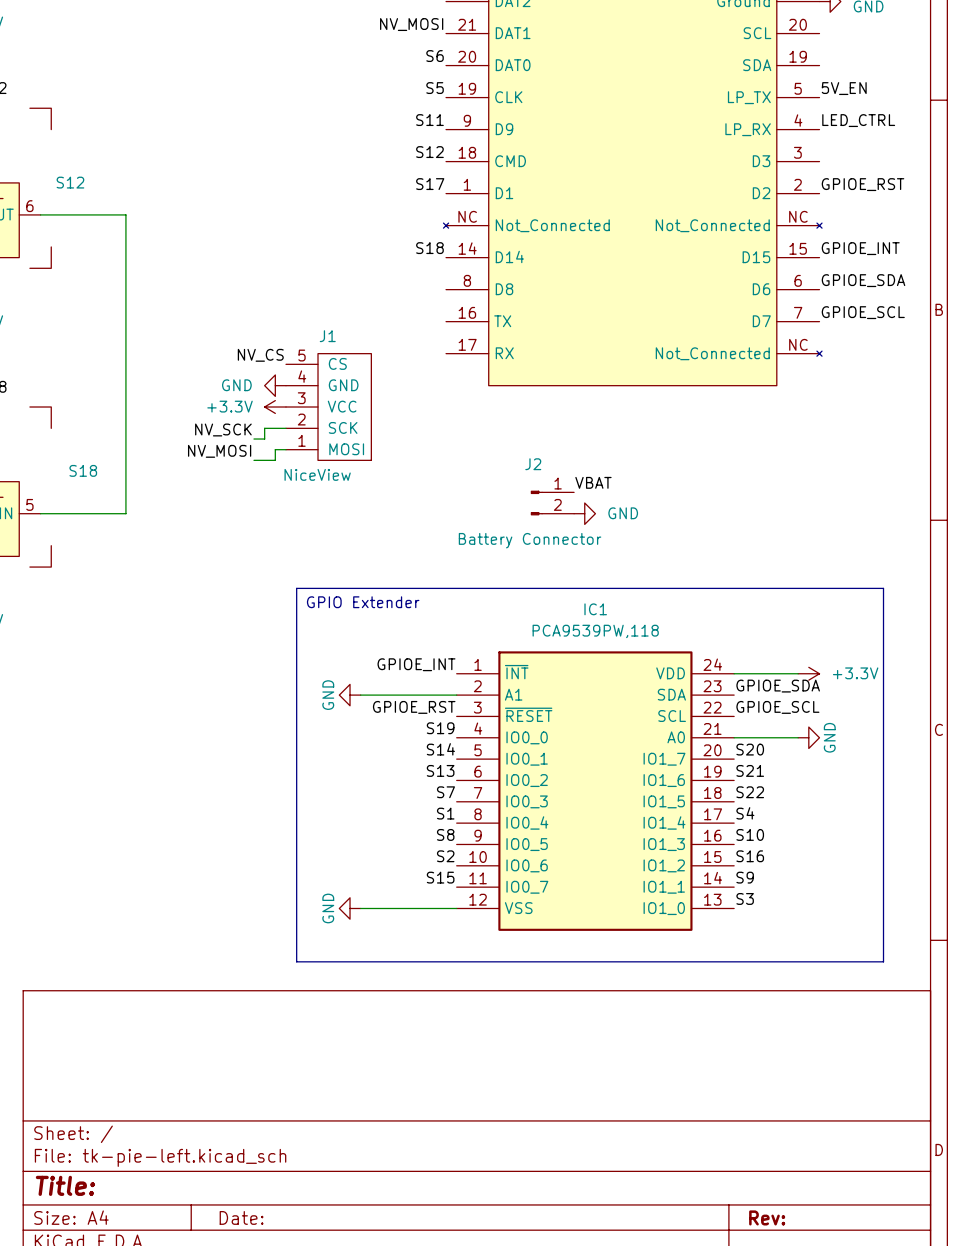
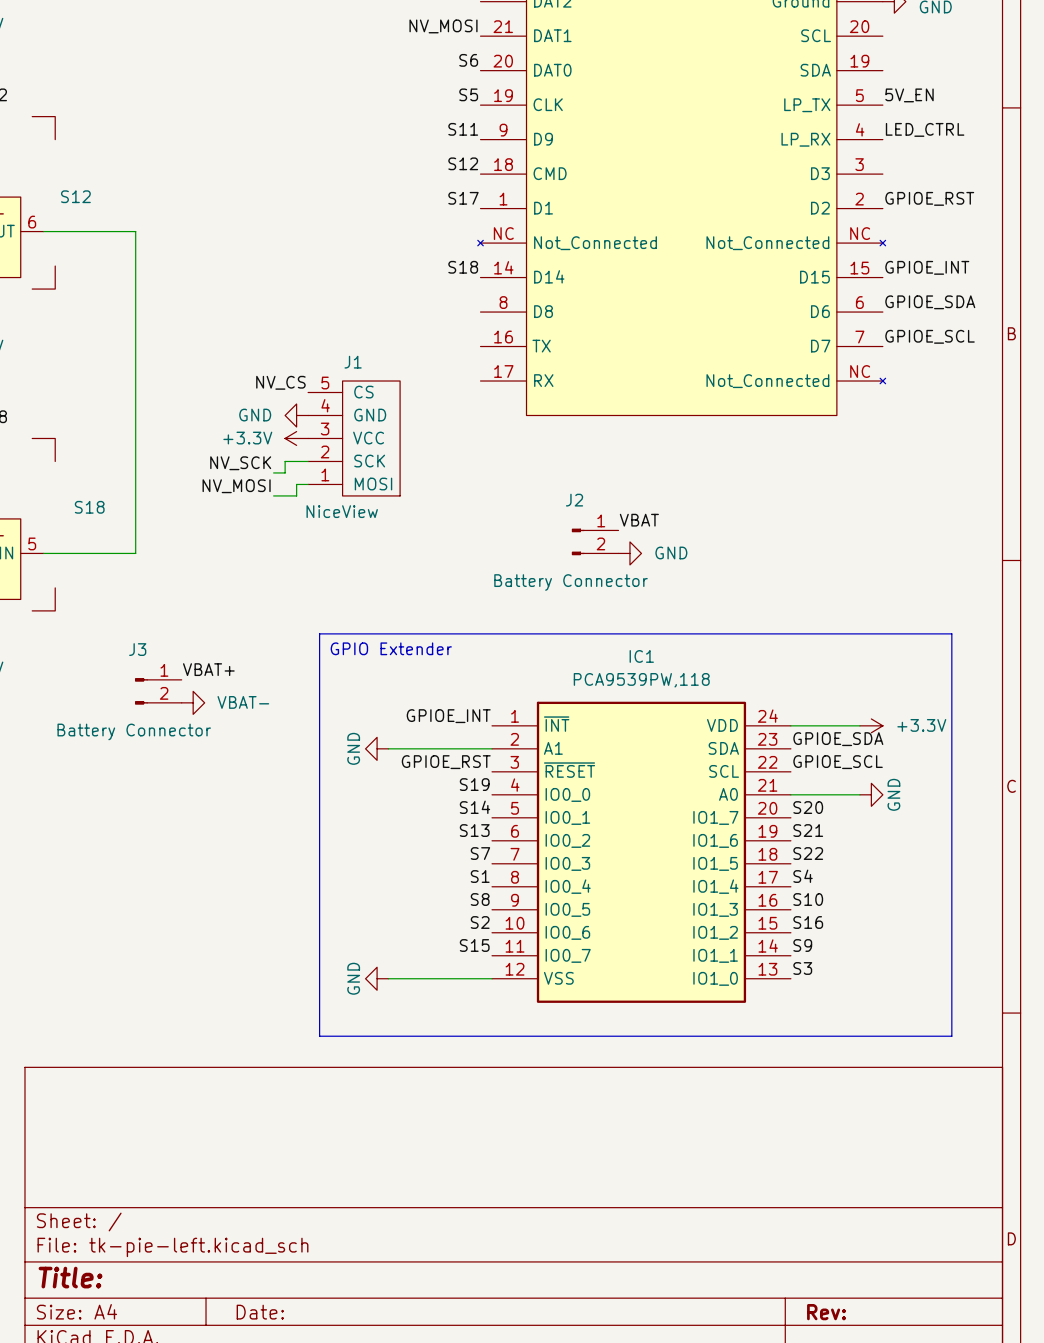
label: none -> VBAT+ (208, 669)
J3: none -> Battery Connector (158, 691)
power symbol: none -> VBAT- (193, 702)

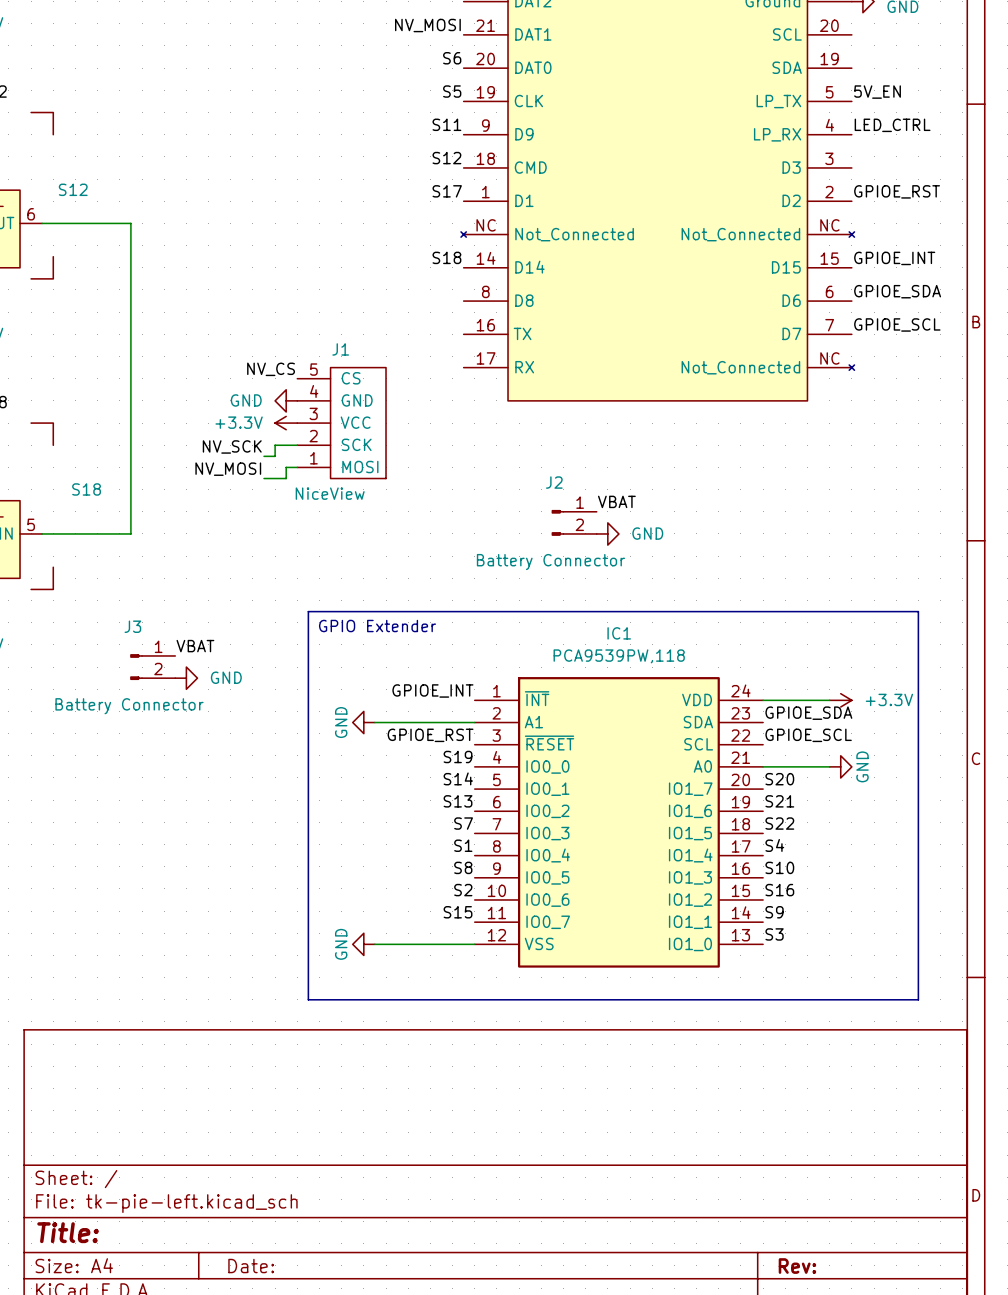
label: VBAT+ (208, 669) -> VBAT (195, 646)
power symbol: VBAT- (193, 702) -> GND (186, 678)

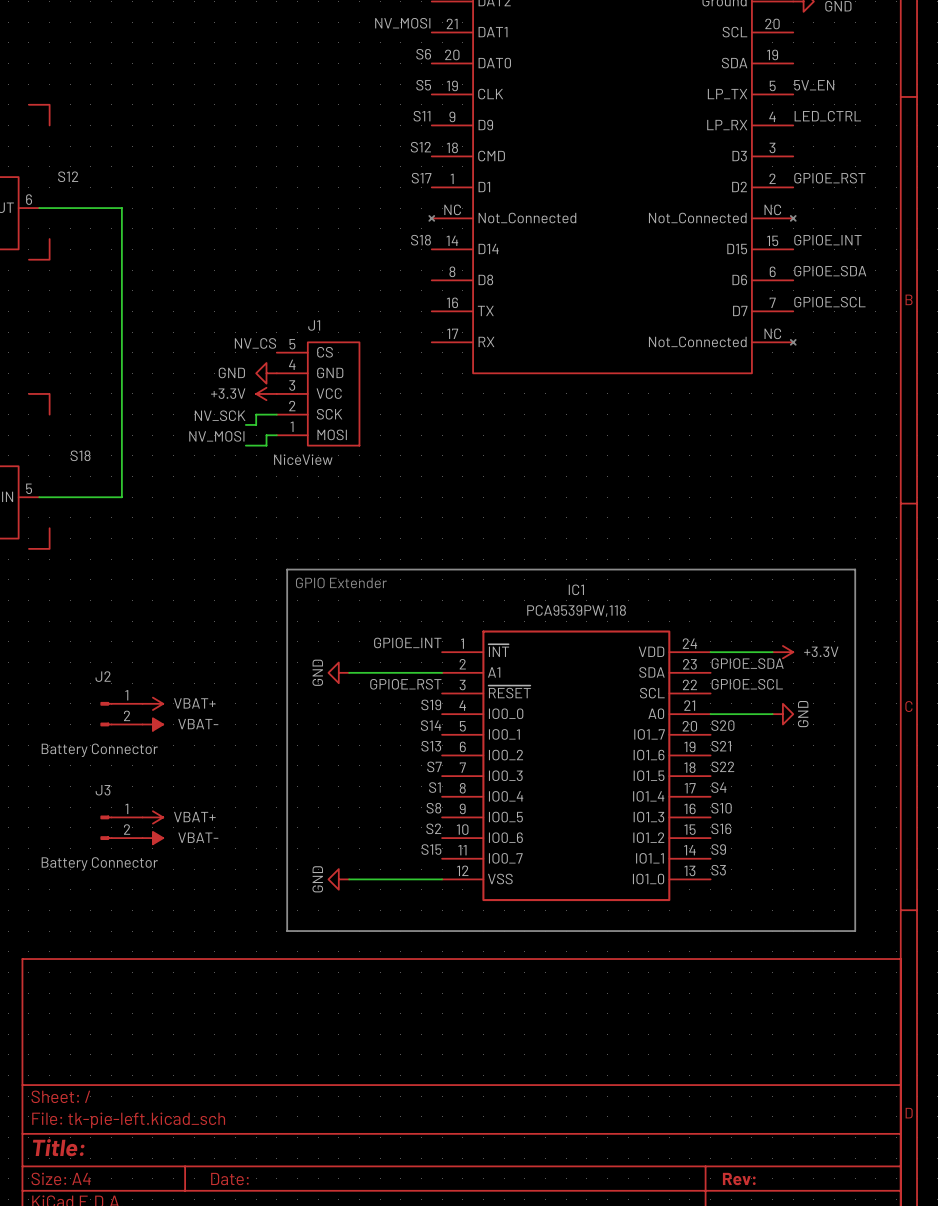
label: VBAT (616, 501) -> none
J2 position: (574, 522) -> (121, 714)
power symbol: GND (607, 533) -> none
label: VBAT (195, 646) -> none
J3 position: (152, 667) -> (121, 827)
power symbol: GND (186, 678) -> none
power symbol: none -> VBAT+ (152, 703)
power symbol: none -> VBAT- (152, 724)
power symbol: none -> VBAT+ (152, 817)
power symbol: none -> VBAT- (152, 838)

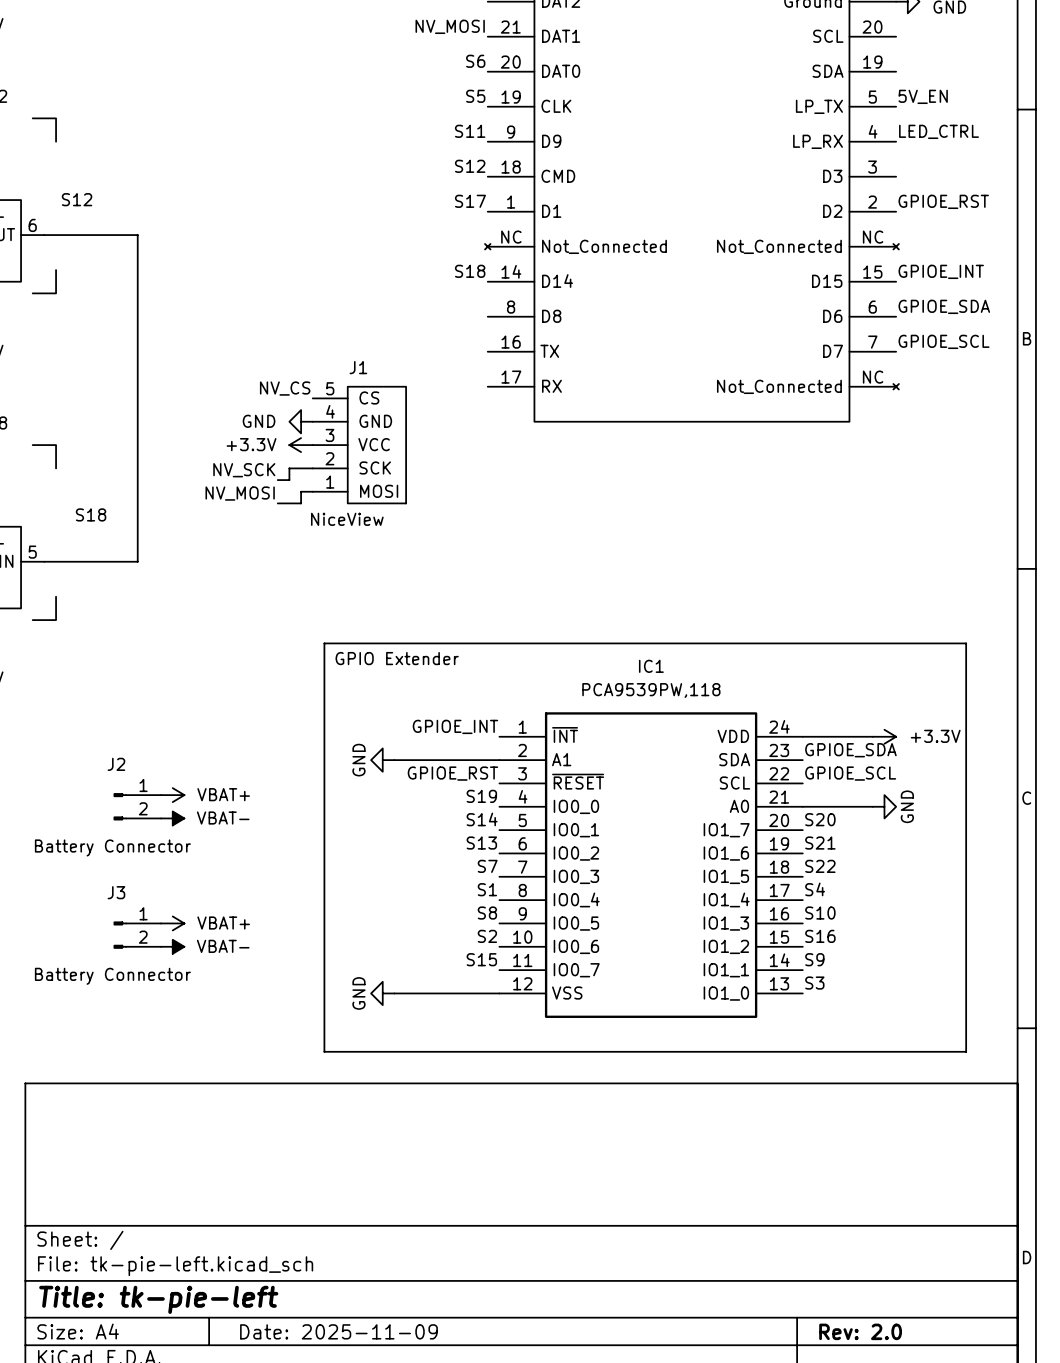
title block: Title: (58, 1147) -> Title: tk-pie-left (158, 1299)
title block: Date: (229, 1179) -> Date: 2025-11-09 (338, 1331)
title block: Rev: (739, 1179) -> Rev: 2.0 (860, 1331)

